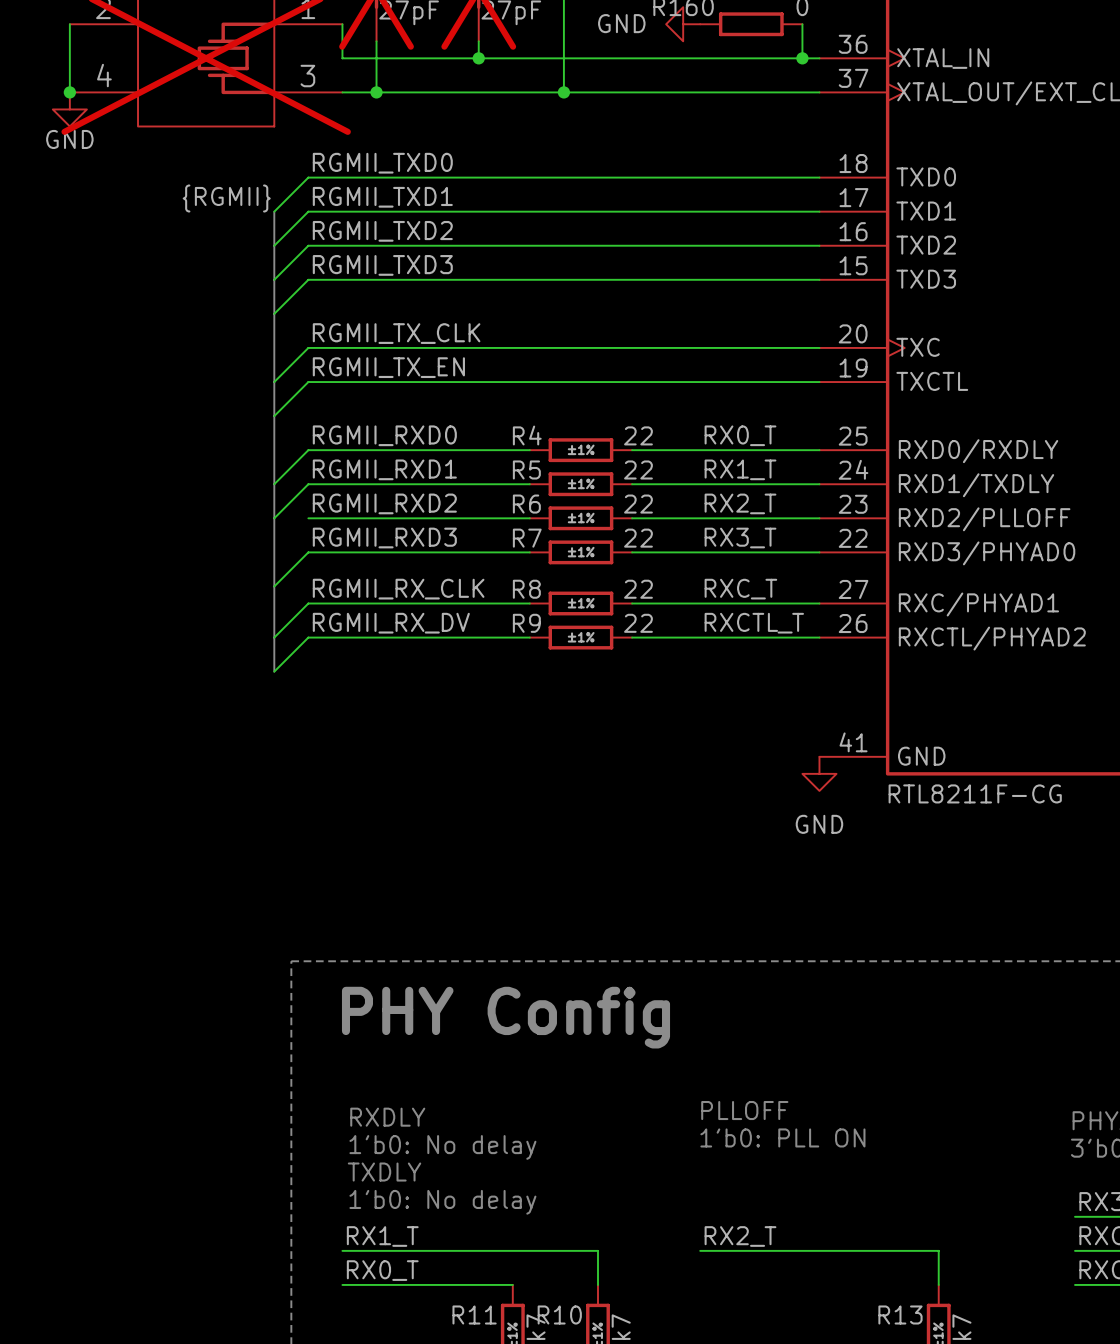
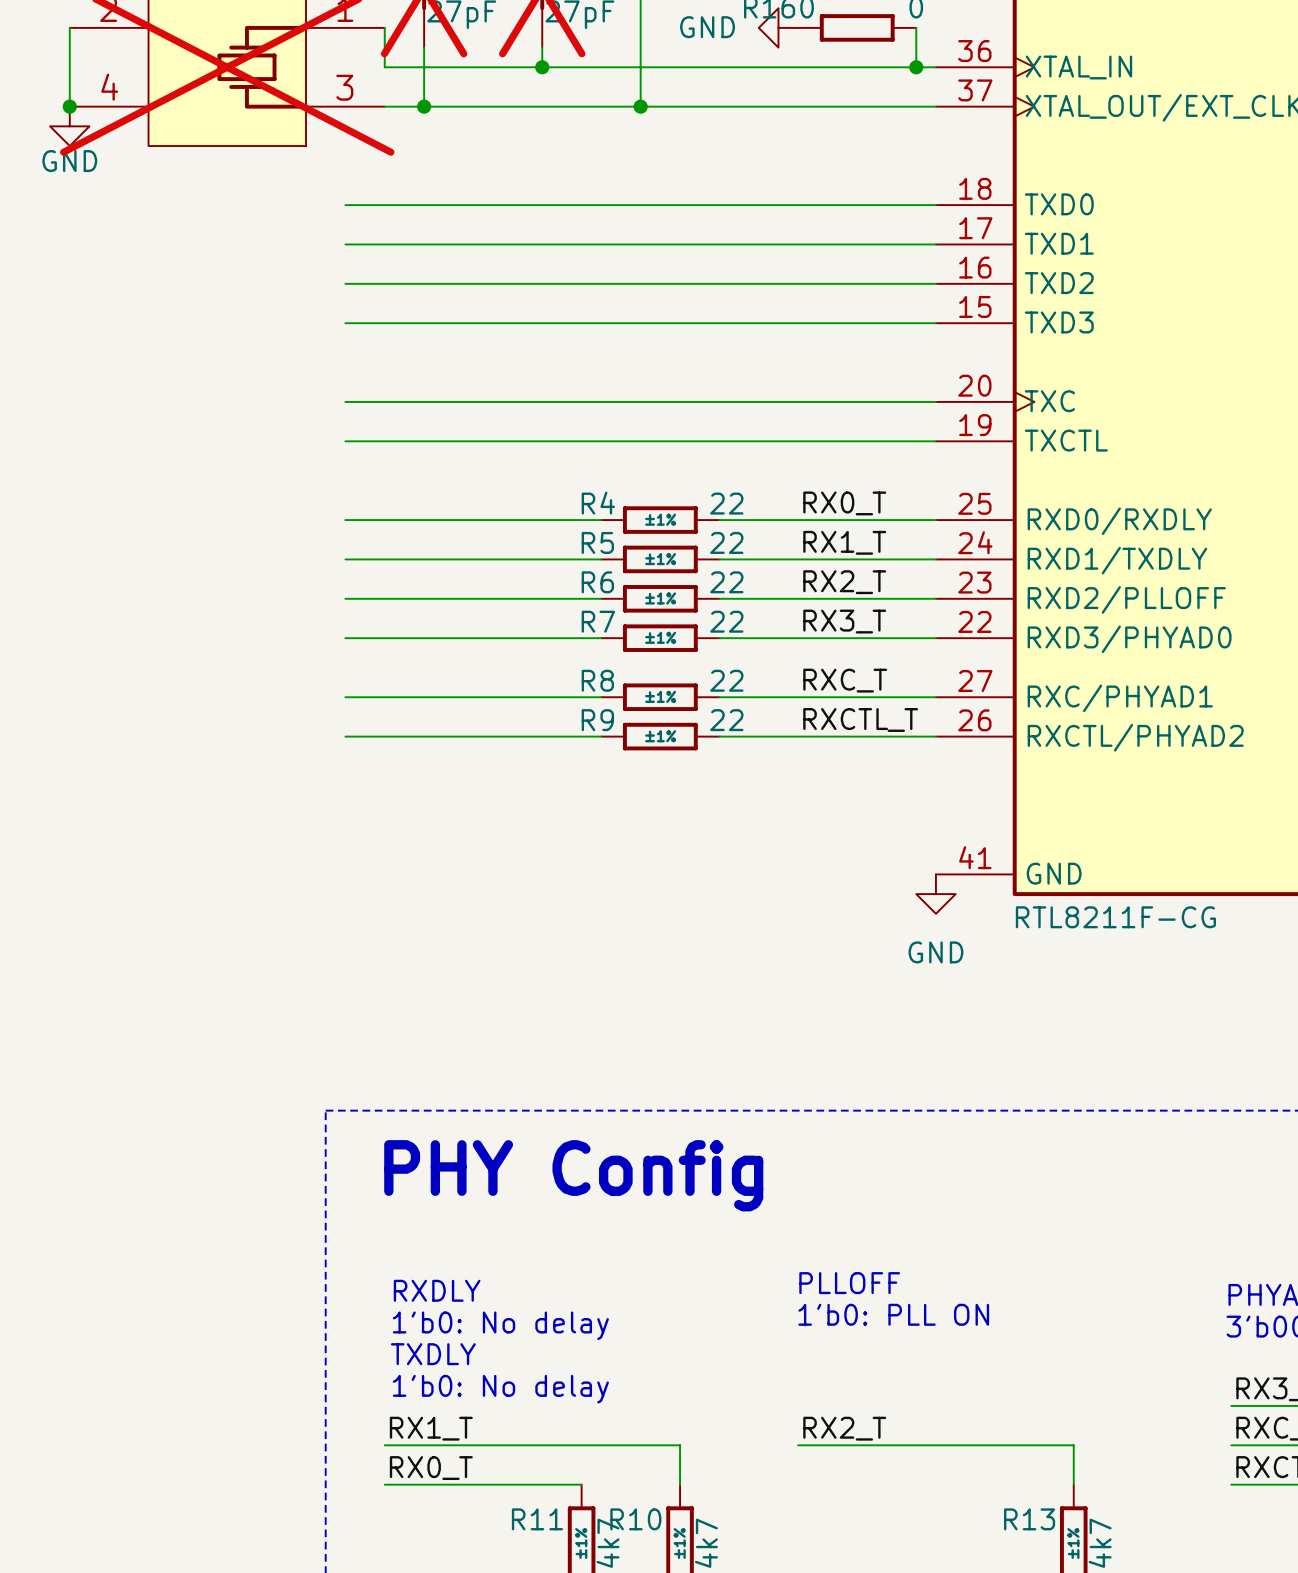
label: RGMII_TXD0 (382, 163) -> none
wire: (308, 177) (274, 211) -> none
label: RGMII_TXD1 (382, 197) -> none
label: {RGMII} (226, 198) -> none
bus: (274, 211) (274, 671) -> none
wire: (308, 211) (274, 245) -> none
label: RGMII_TXD2 (382, 231) -> none
wire: (308, 245) (274, 279) -> none
label: RGMII_TXD3 (382, 265) -> none
wire: (308, 279) (274, 313) -> none
label: RGMII_TX_CLK (396, 333) -> none
wire: (308, 347) (274, 382) -> none
label: RGMII_TX_EN (388, 367) -> none
wire: (308, 382) (274, 416) -> none
label: RGMII_RXD0 (384, 435) -> none
wire: (308, 450) (274, 484) -> none
label: RGMII_RXD1 (384, 469) -> none
wire: (308, 484) (274, 518) -> none
label: RGMII_RXD2 (384, 503) -> none
label: RGMII_RXD3 (384, 538) -> none
wire: (308, 552) (274, 586) -> none
label: RGMII_RX_CLK (398, 589) -> none
wire: (308, 603) (274, 637) -> none
label: RGMII_RX_DV (391, 623) -> none
wire: (308, 637) (274, 671) -> none

